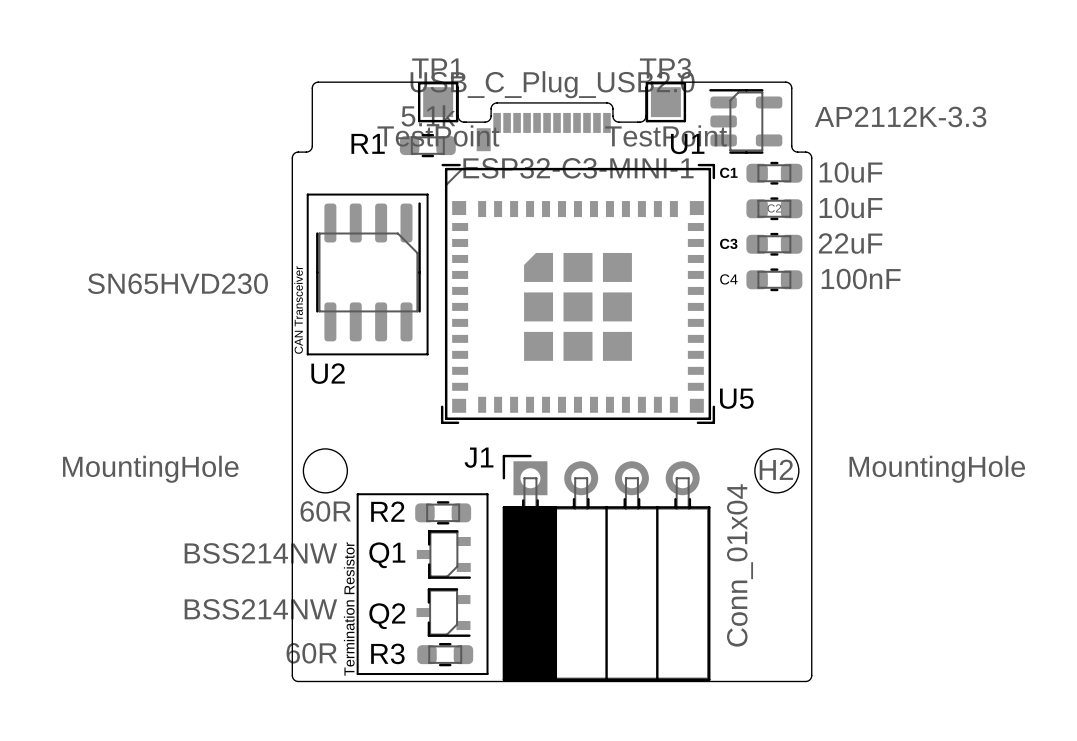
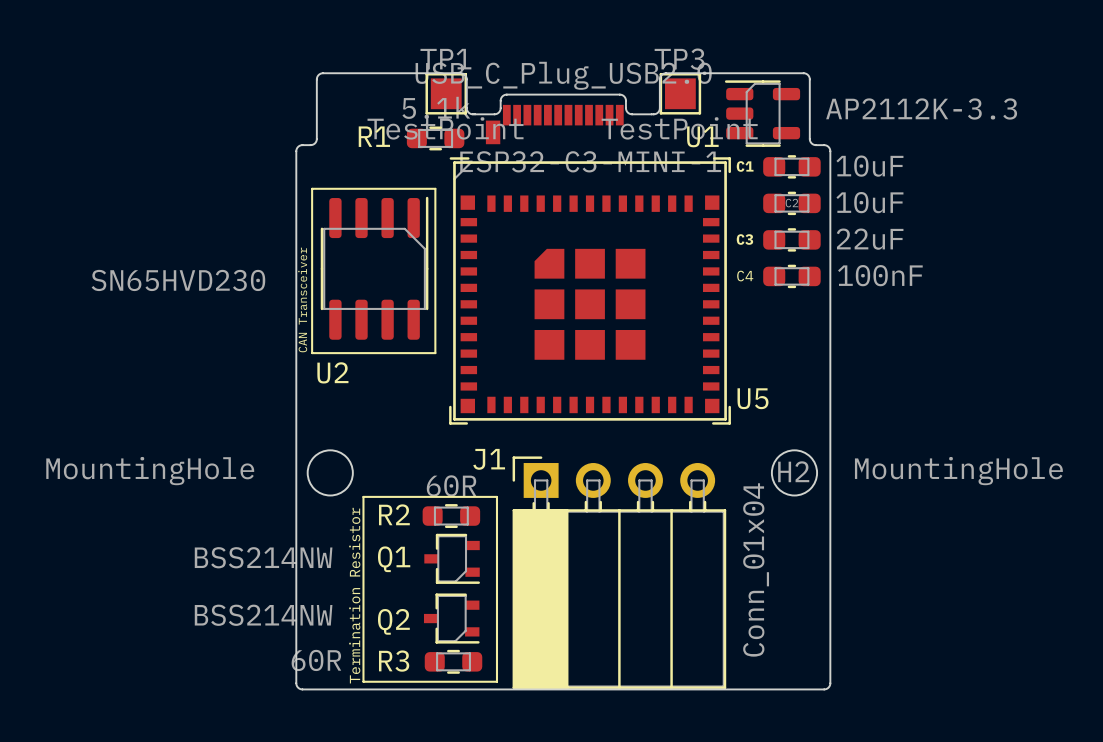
R2 value position: 60R (325, 511) -> 60R (451, 485)

